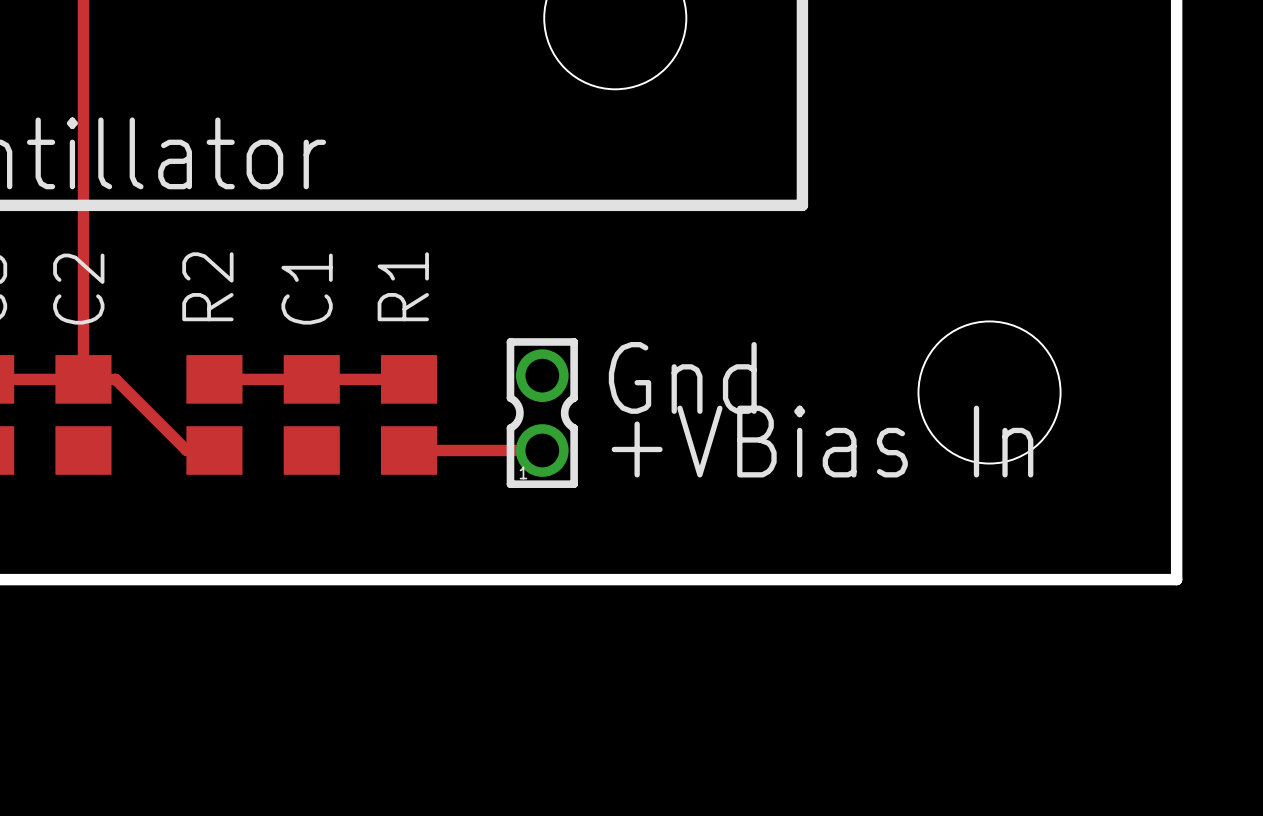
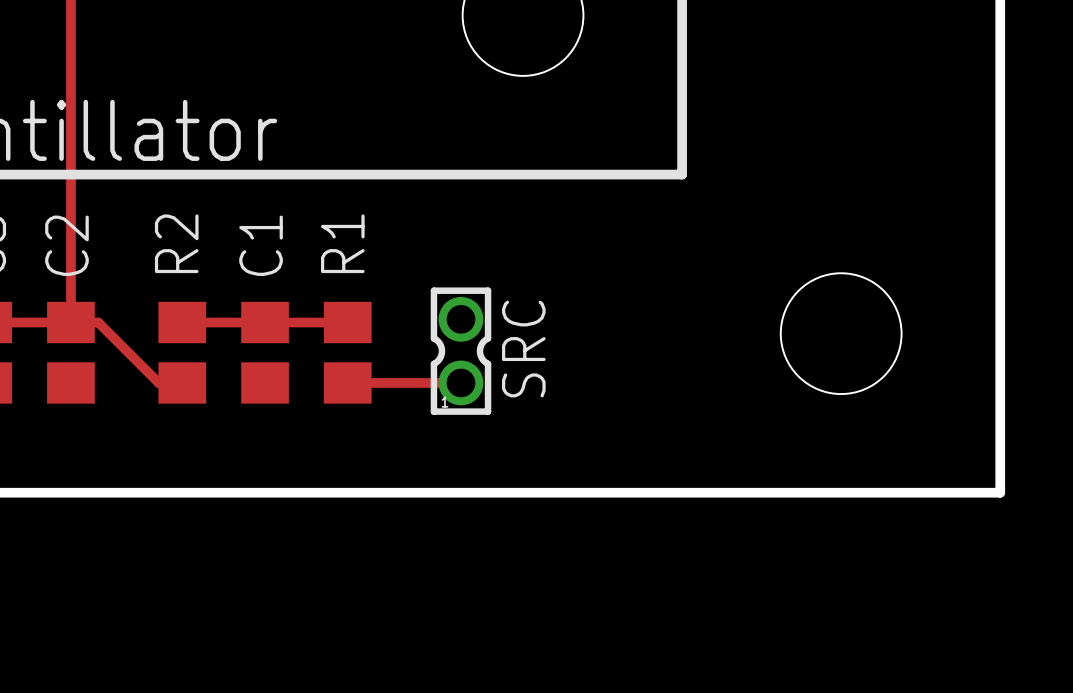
text: Gnd (682, 377) -> none
SRC name: none -> SRC (523, 349)
text: +VBias In (822, 441) -> none

